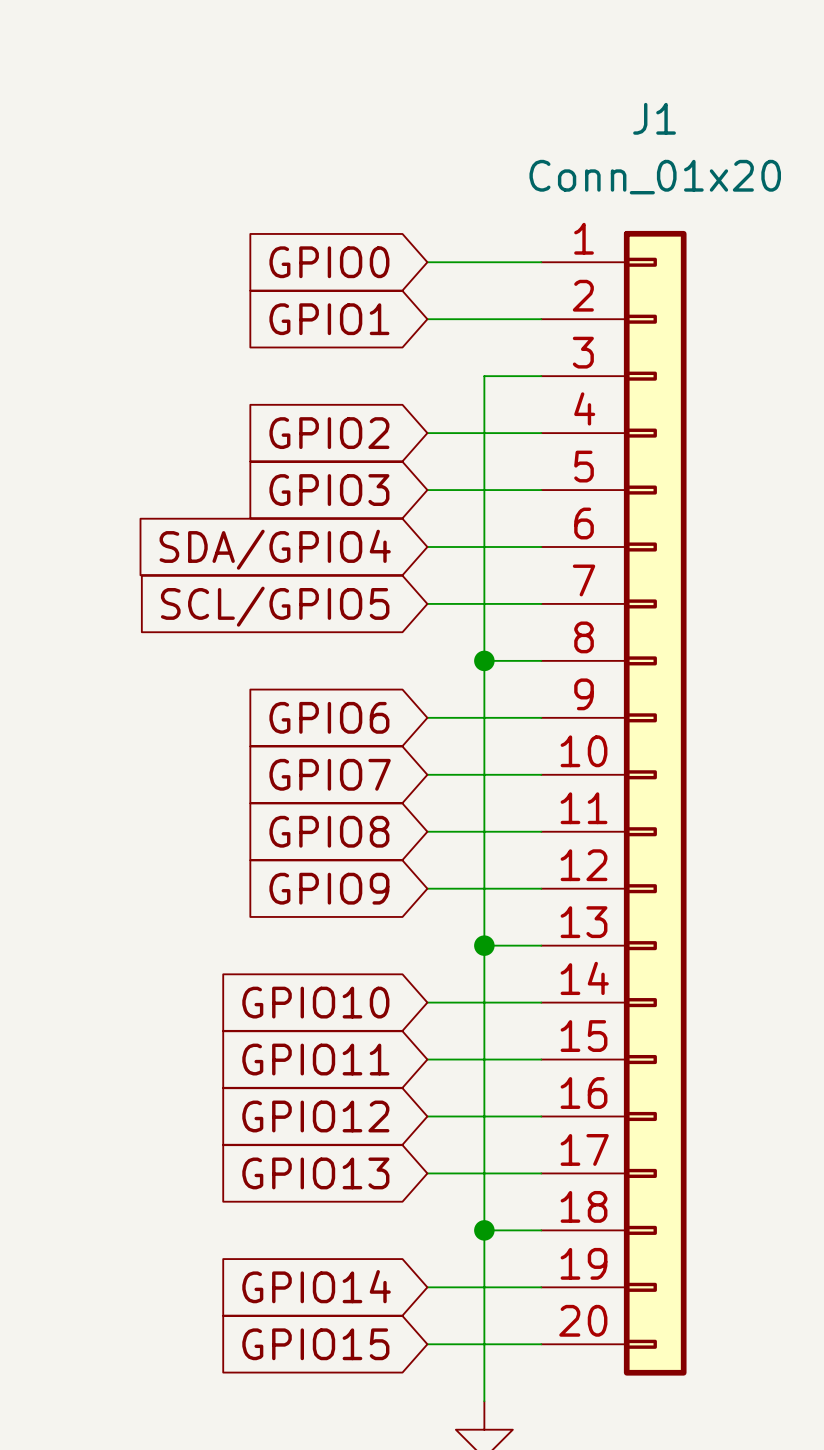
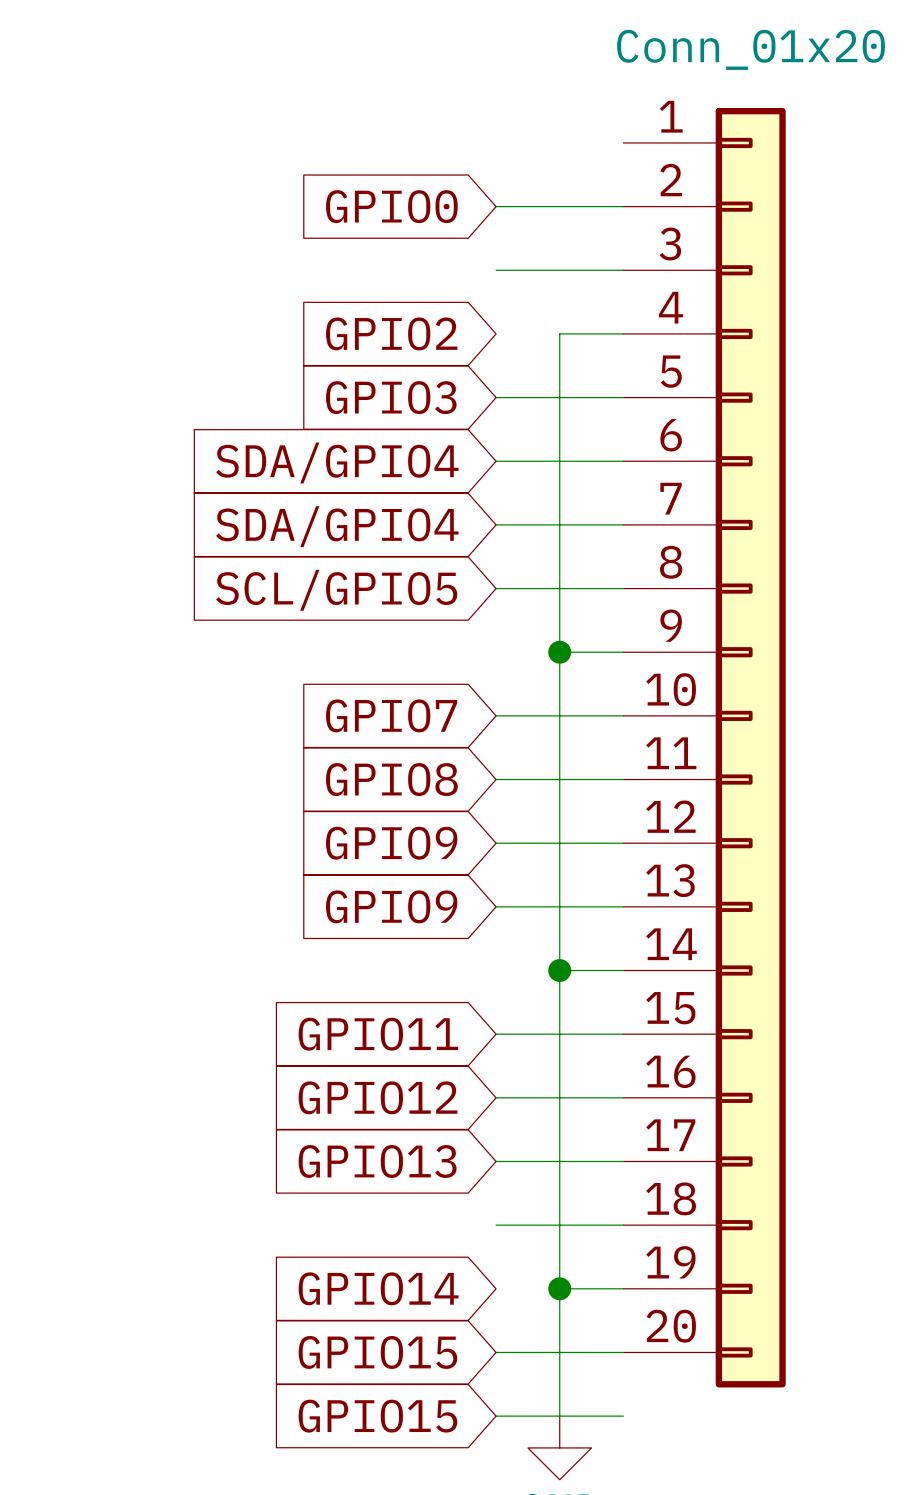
global label: GPIO0 (329, 262) -> none
wire: (427, 262) (541, 262) -> none
global label: GPIO1 (329, 319) -> GPIO0 (391, 206)
wire: (484, 376) (484, 433) (427, 433) -> (559, 270) (496, 270)
global label: SCL/GPIO5 (275, 606) -> SDA/GPIO4 (337, 526)
junction position: (484, 660) -> (559, 652)
global label: none -> SCL/GPIO5 (336, 590)
global label: GPIO6 (329, 717) -> none
wire: (427, 717) (484, 717) -> (496, 588) (559, 588)
junction position: (484, 945) -> (559, 970)
global label: GPIO10 (315, 1002) -> GPIO9 (391, 906)
wire: (427, 1002) (484, 1002) -> (496, 906) (559, 906)
junction position: (484, 1230) -> (559, 1288)
wire: (427, 1287) (484, 1287) -> (496, 1225) (559, 1225)
global label: none -> GPIO15 (377, 1416)
wire: none -> (496, 1416) (623, 1416)

